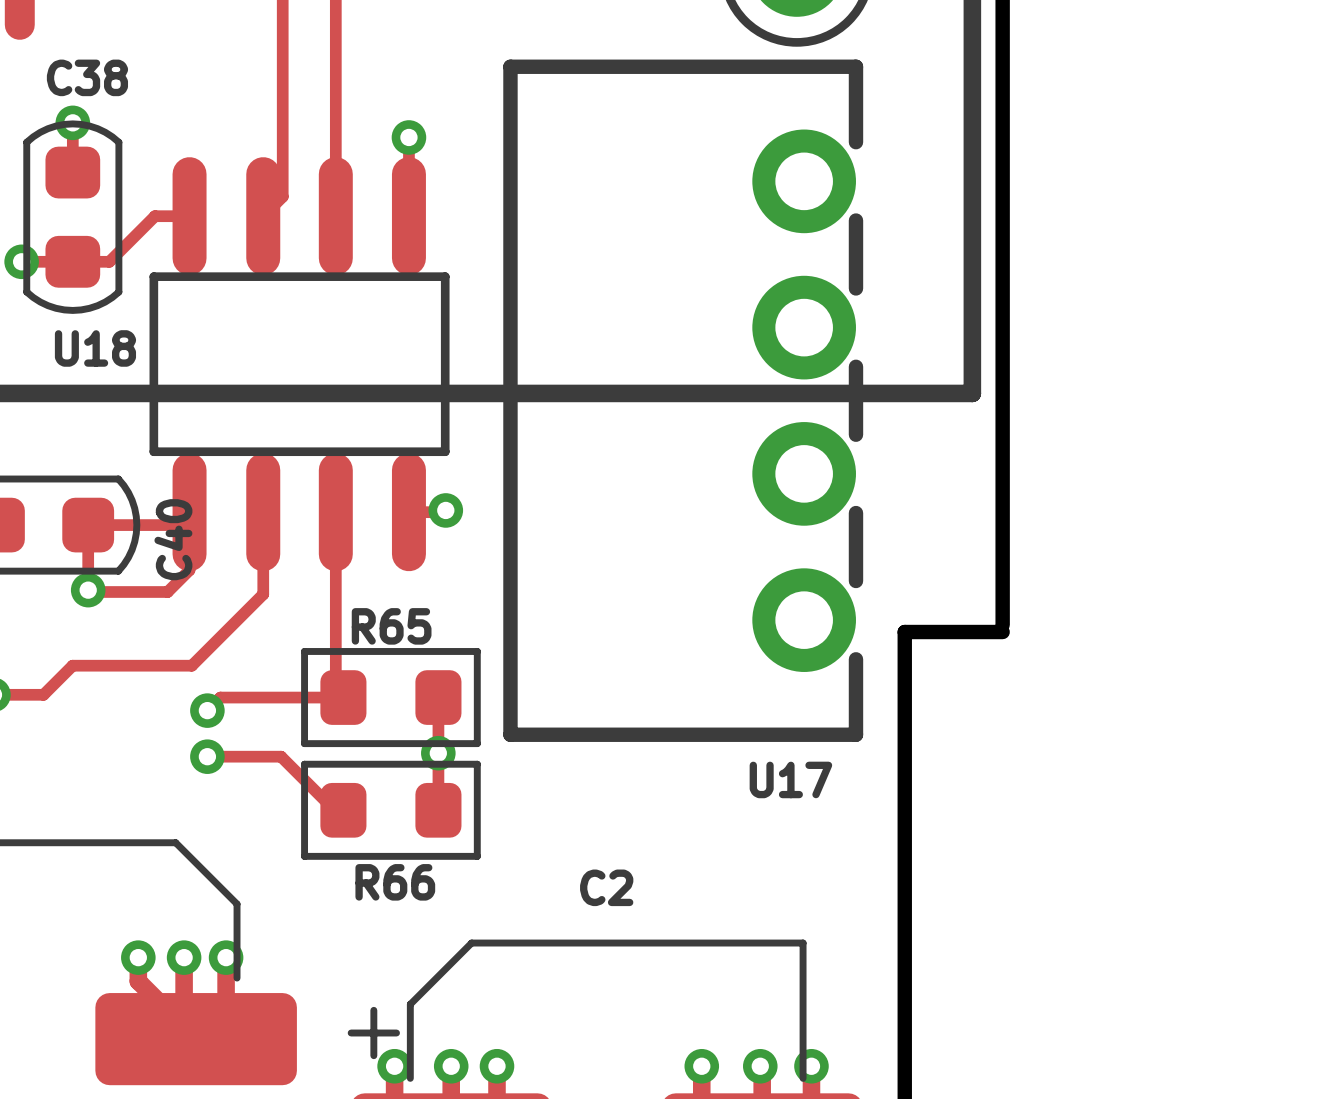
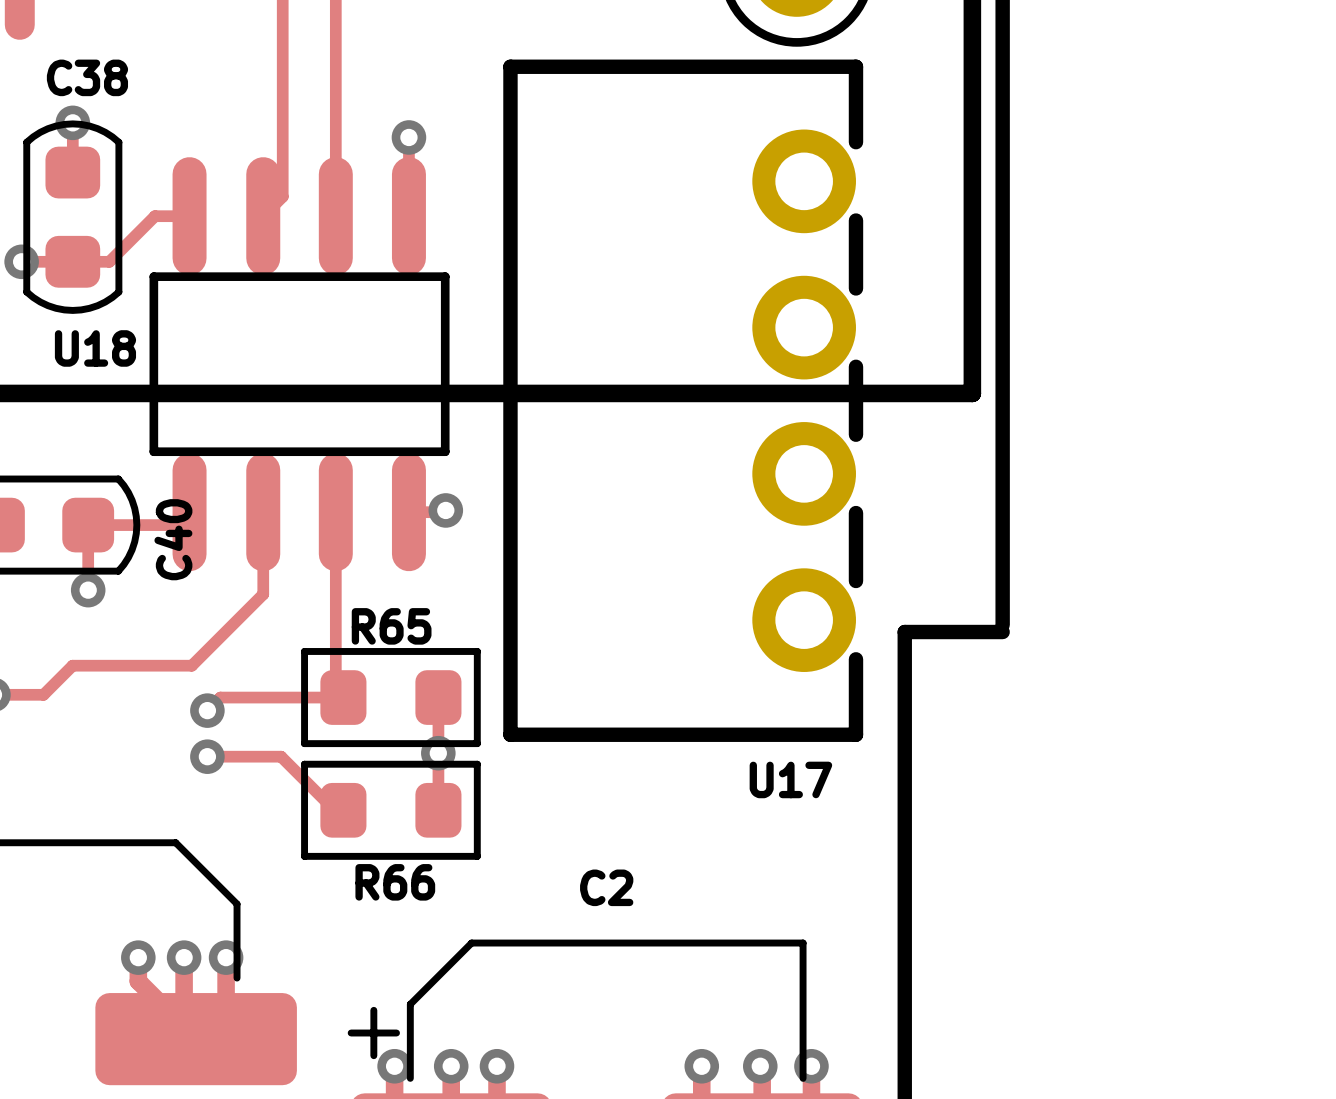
track: (189, 512) (189, 570) (167, 591) (90, 591) (88, 590) -> none

